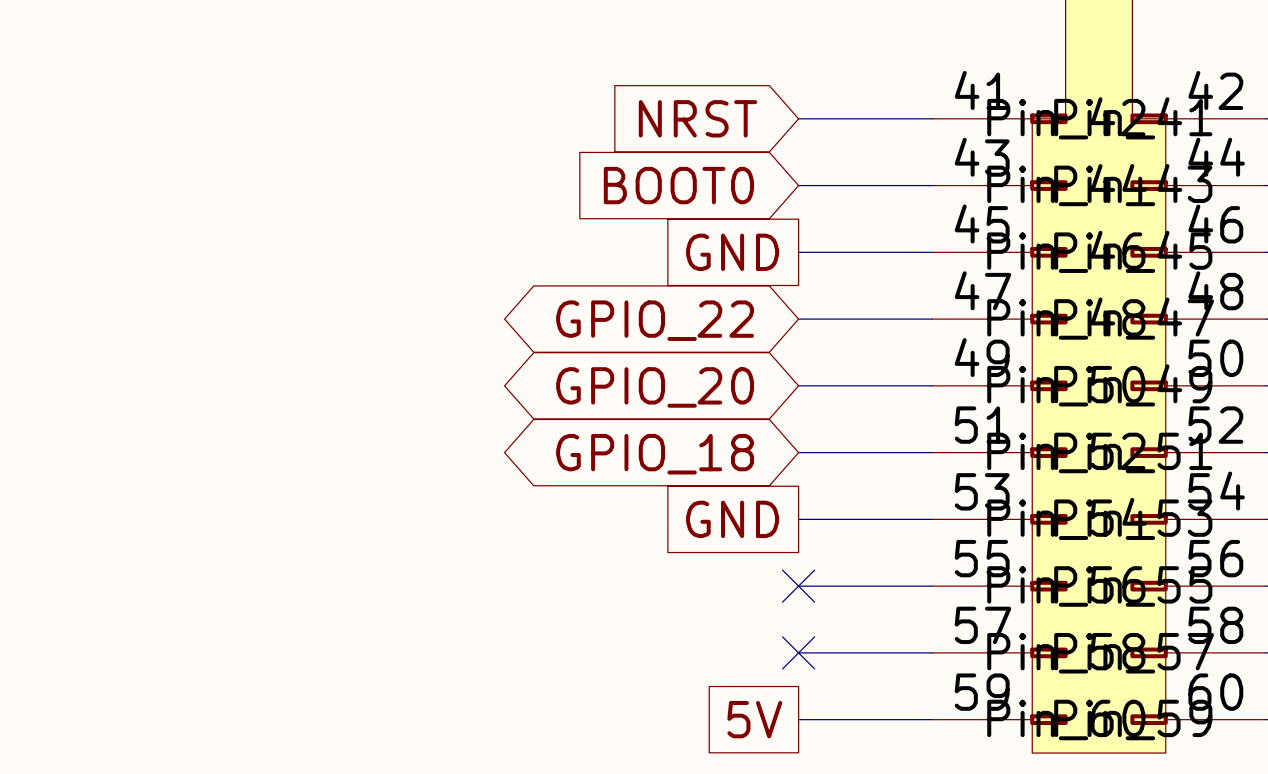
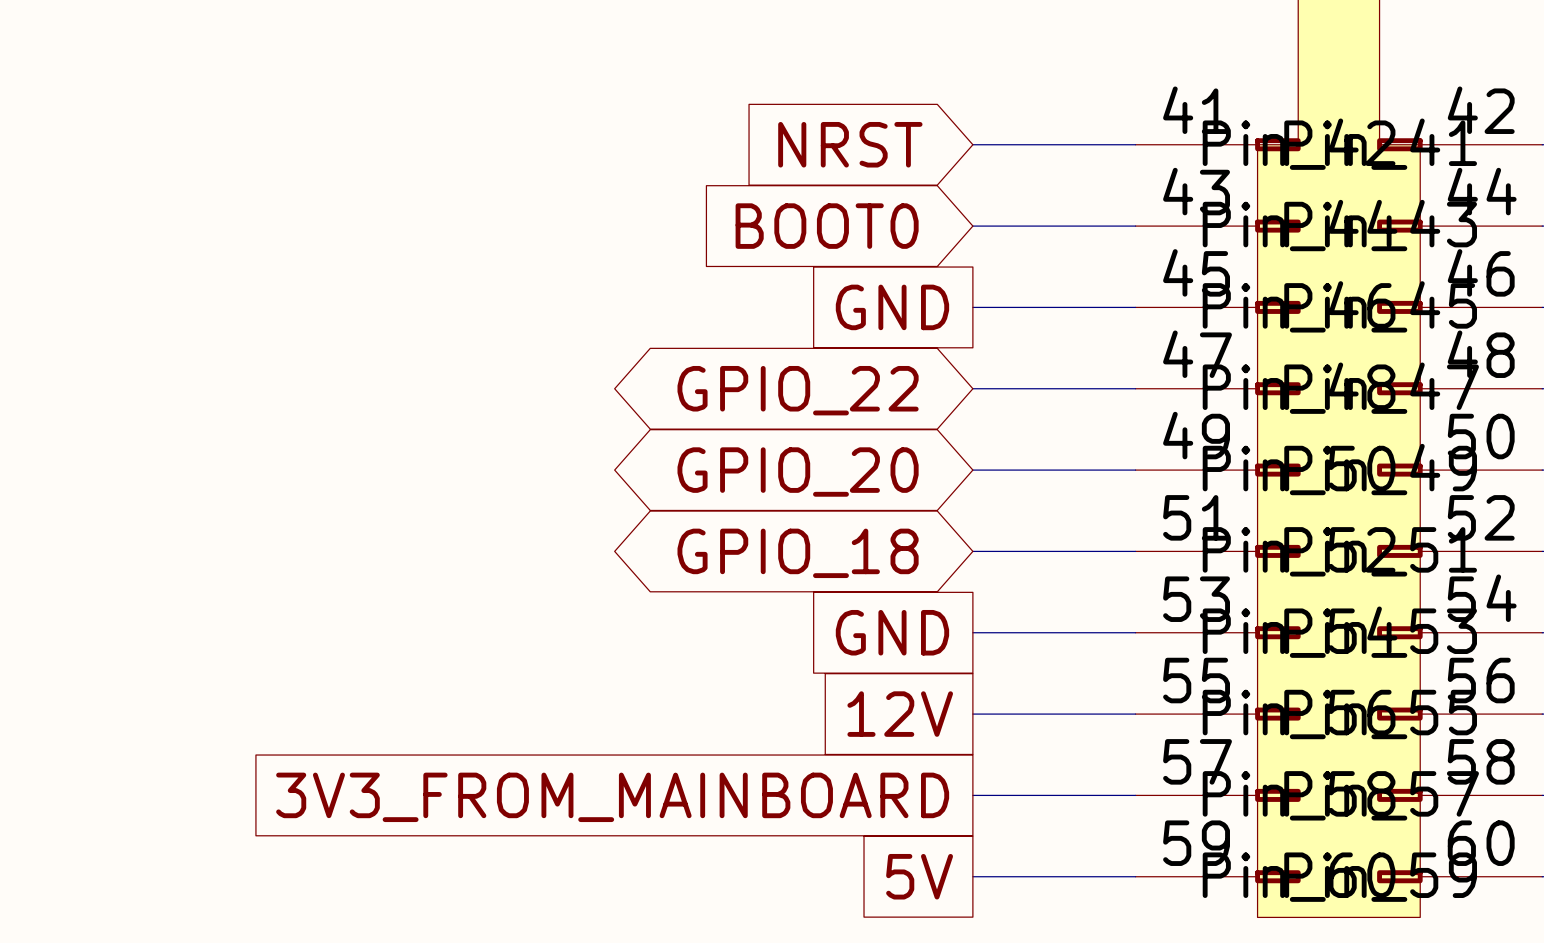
global label: none -> 12V (900, 714)
no-connect mark: (798, 586) -> none
no-connect mark: (798, 652) -> none
global label: none -> 3V3_FROM_MAINBOARD (612, 797)

